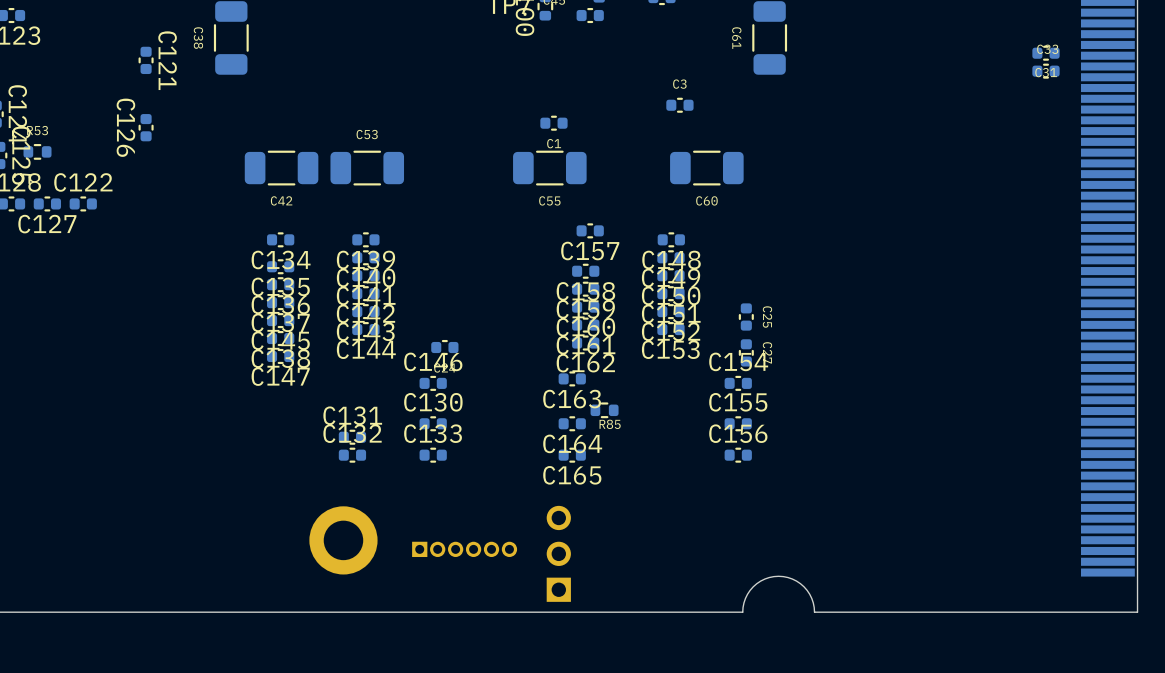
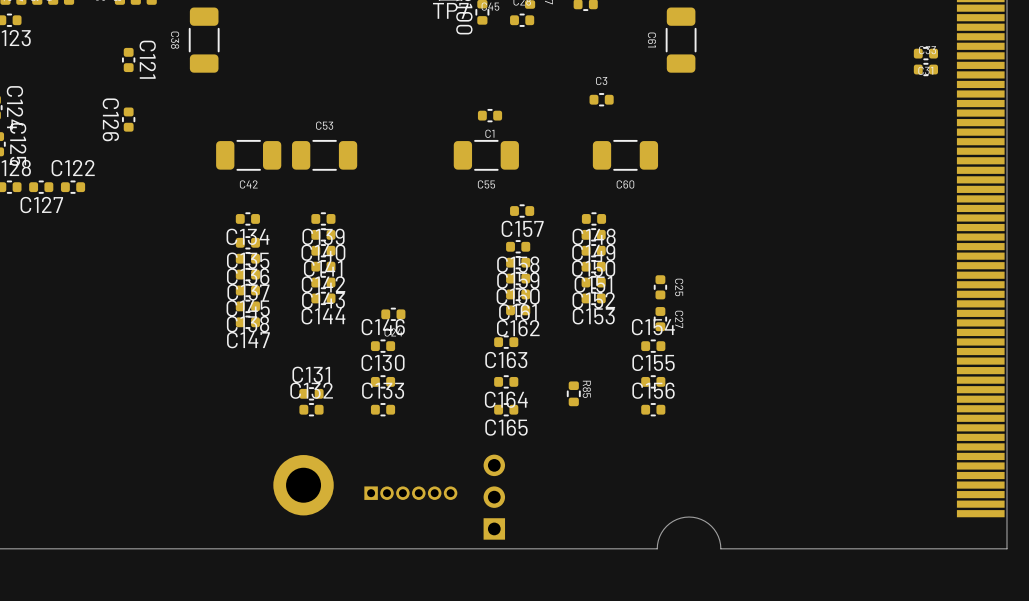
R53: (37, 151) -> none
R85 rotation: 0° (604, 410) -> 90° clockwise (573, 393)
R85 position: (604, 410) -> (573, 393)

